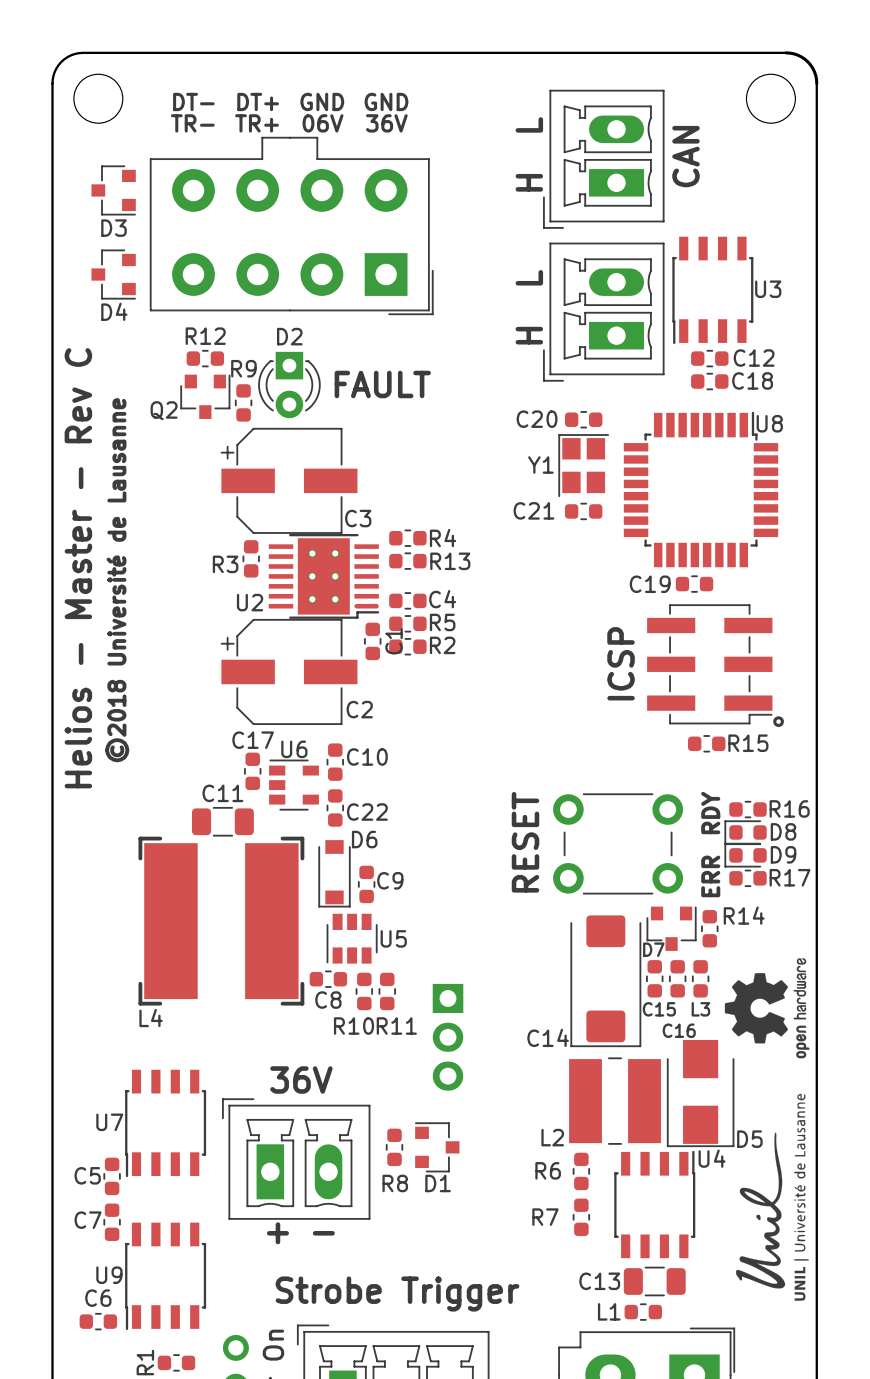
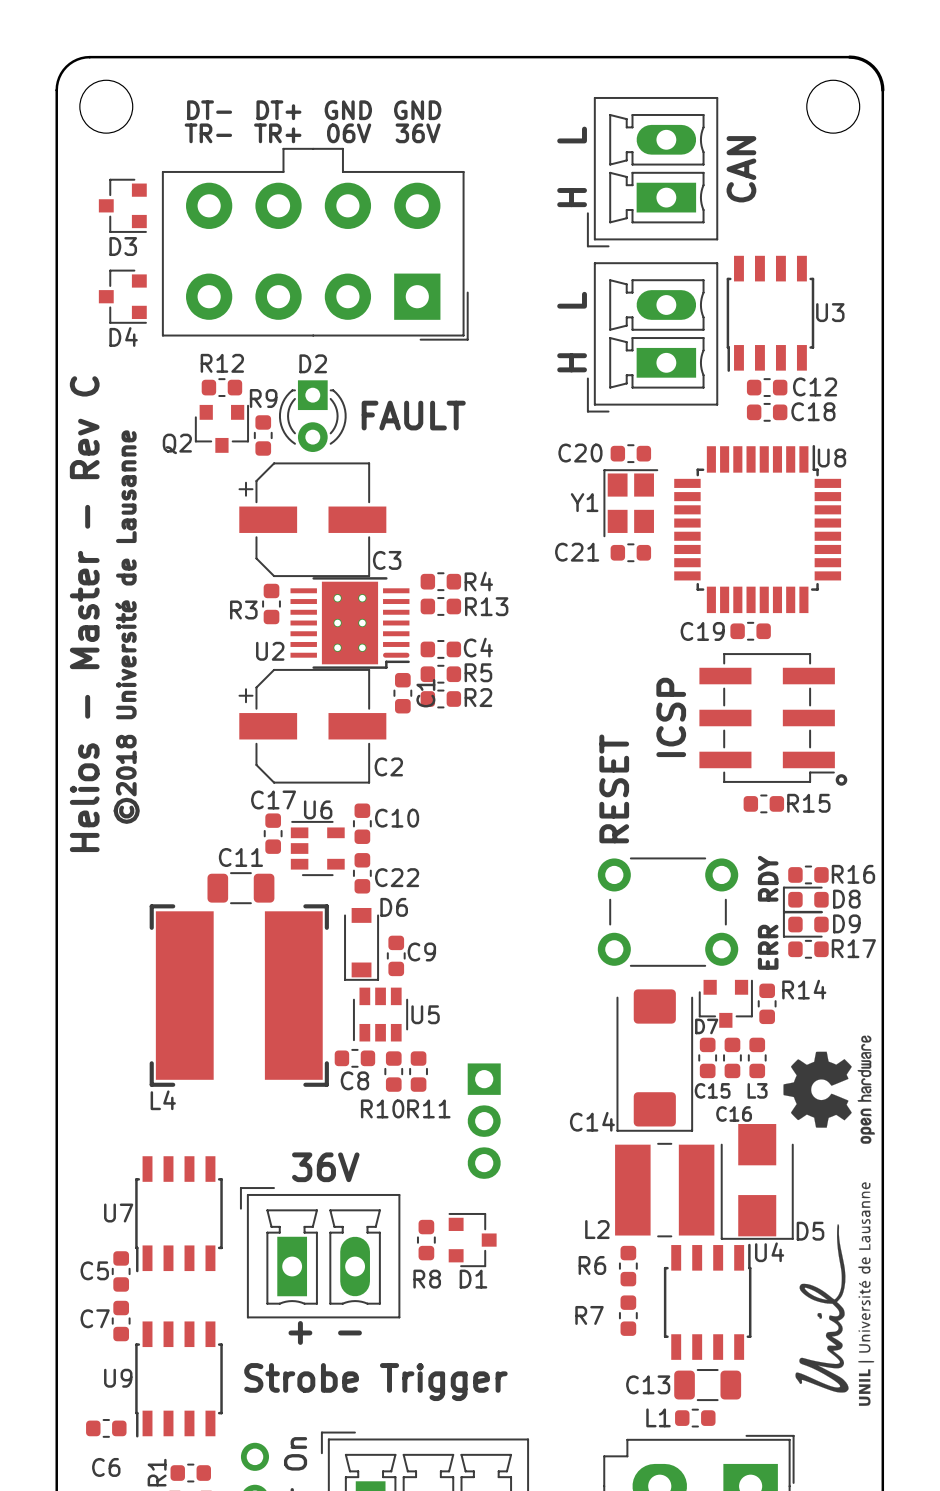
text position: RESET (525, 842) -> RESET (614, 788)
text position: Strobe Trigger (397, 1294) -> Strobe Trigger (375, 1382)
C6 name position: C6 (98, 1298) -> C6 (106, 1467)

